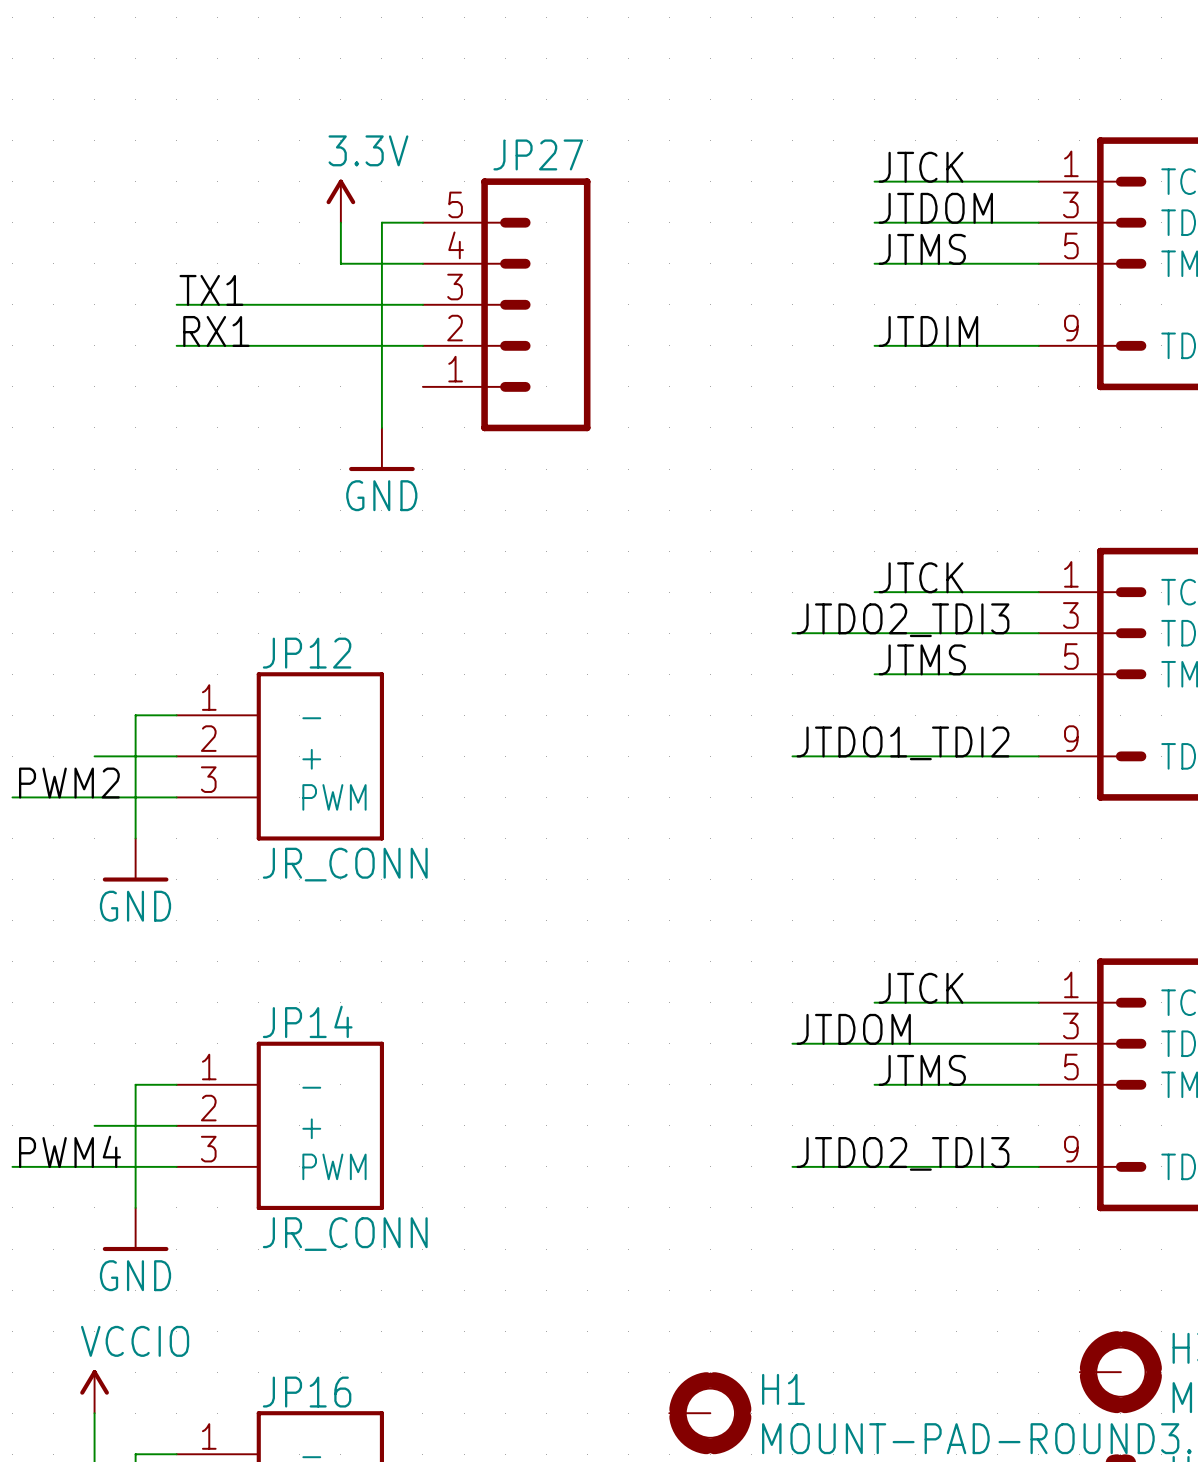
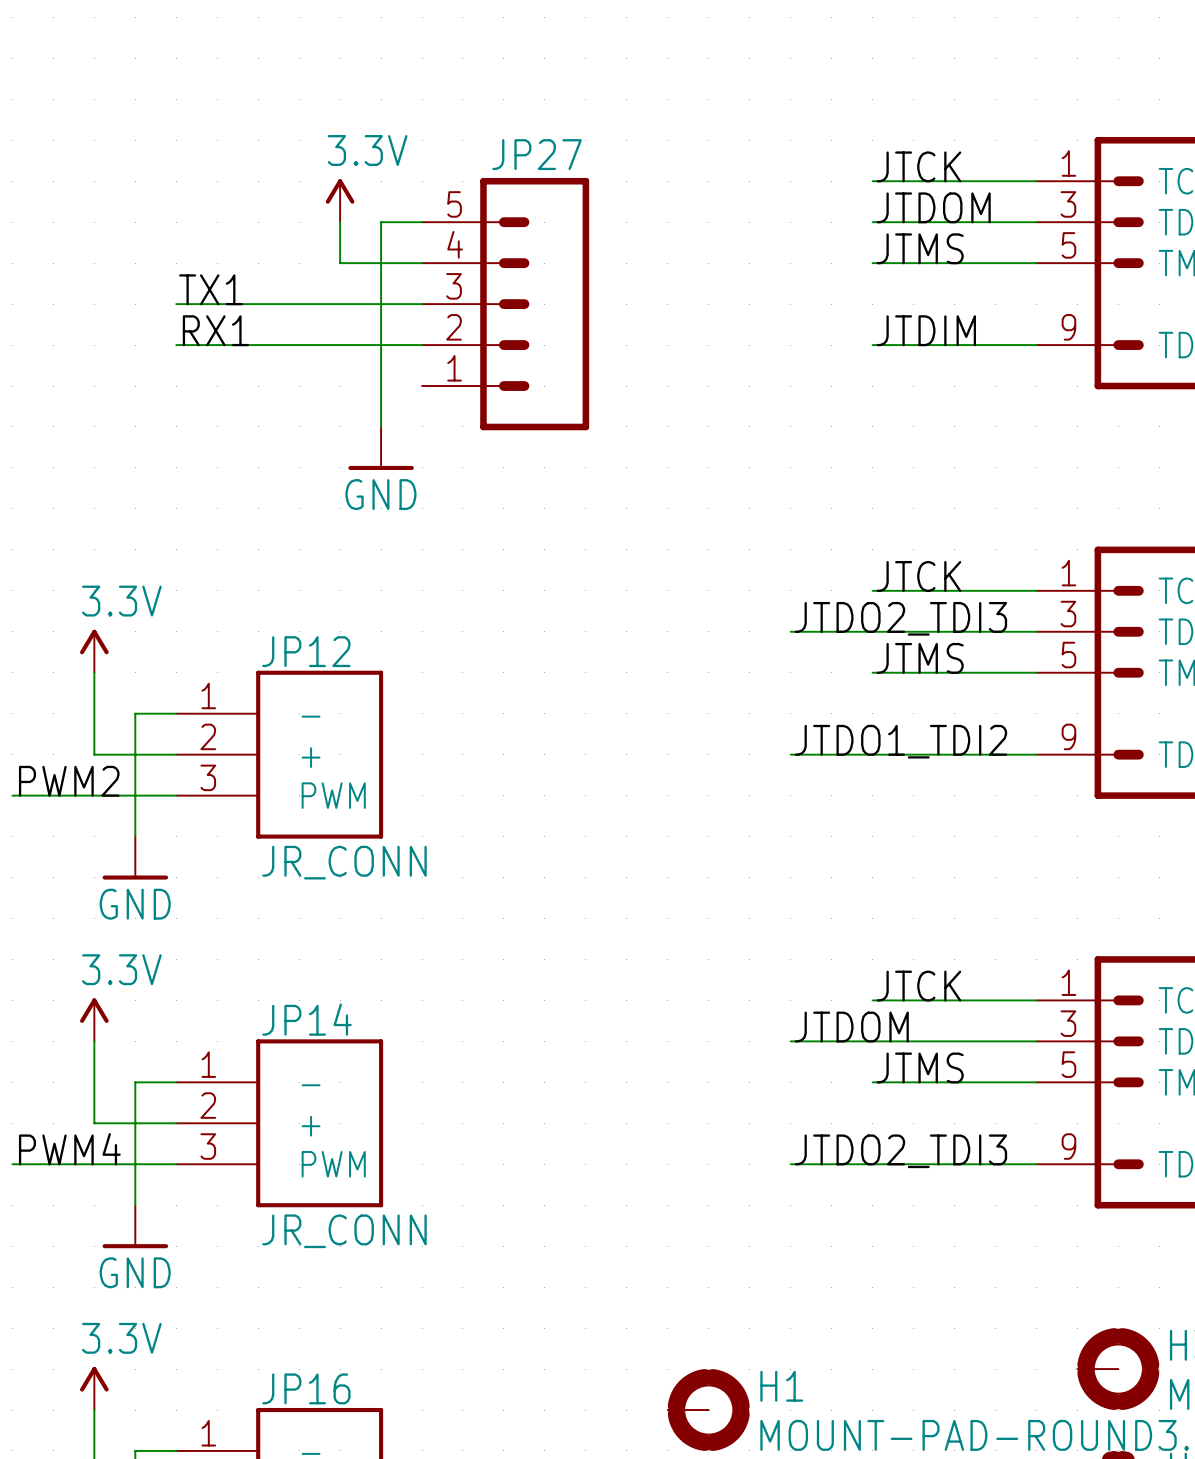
power symbol: none -> 3.3V (94, 651)
wire: none -> (94, 672) (94, 754)
power symbol: none -> 3.3V (94, 1019)
wire: none -> (94, 1041) (94, 1123)
power symbol: VCCIO (94, 1391) -> 3.3V (94, 1388)

